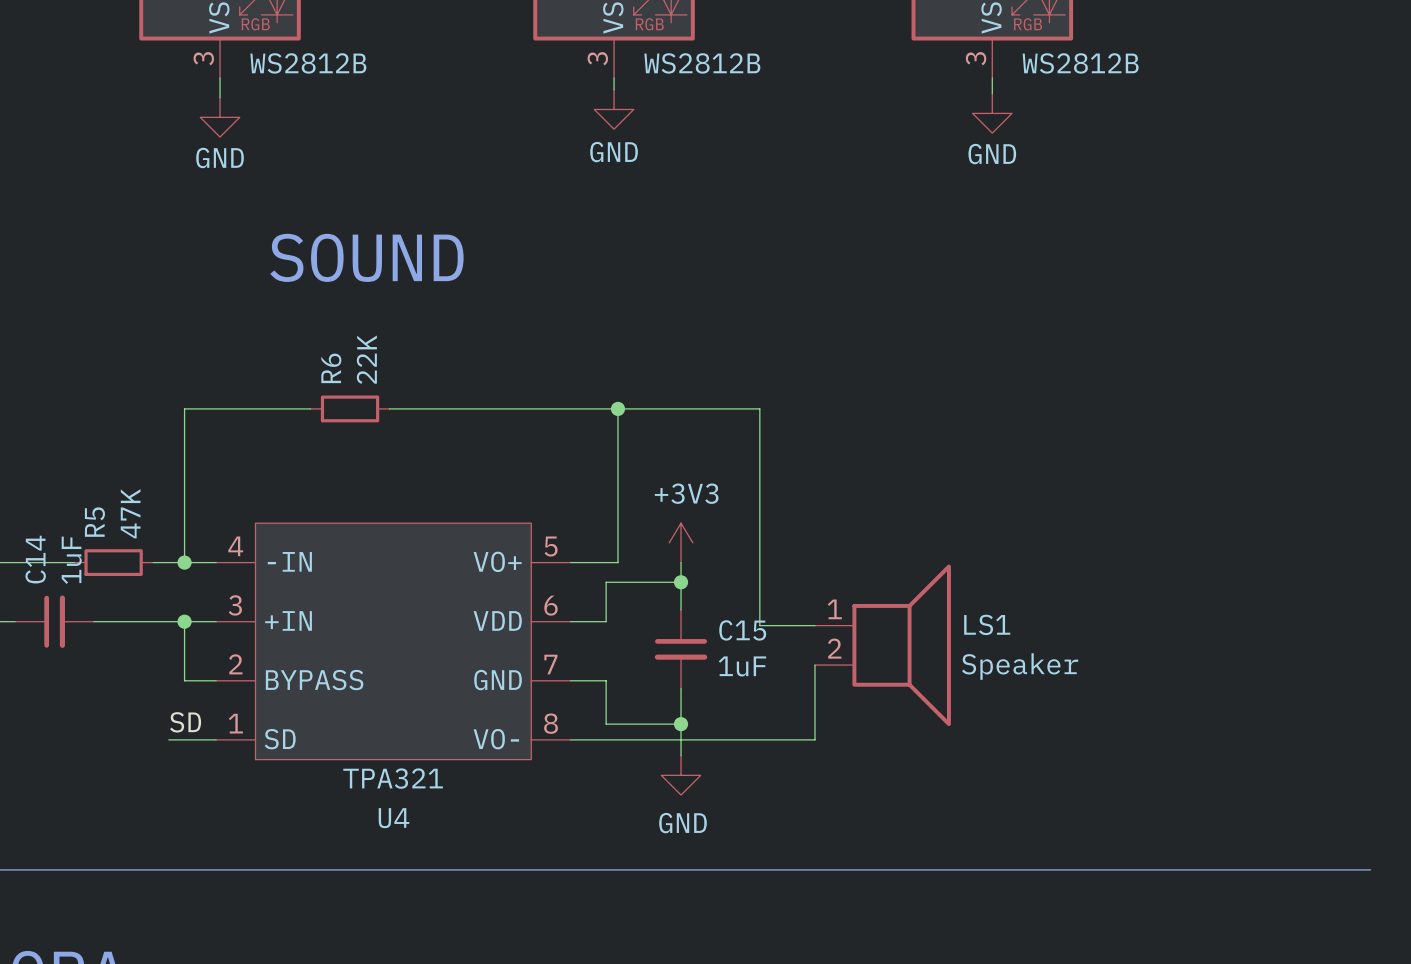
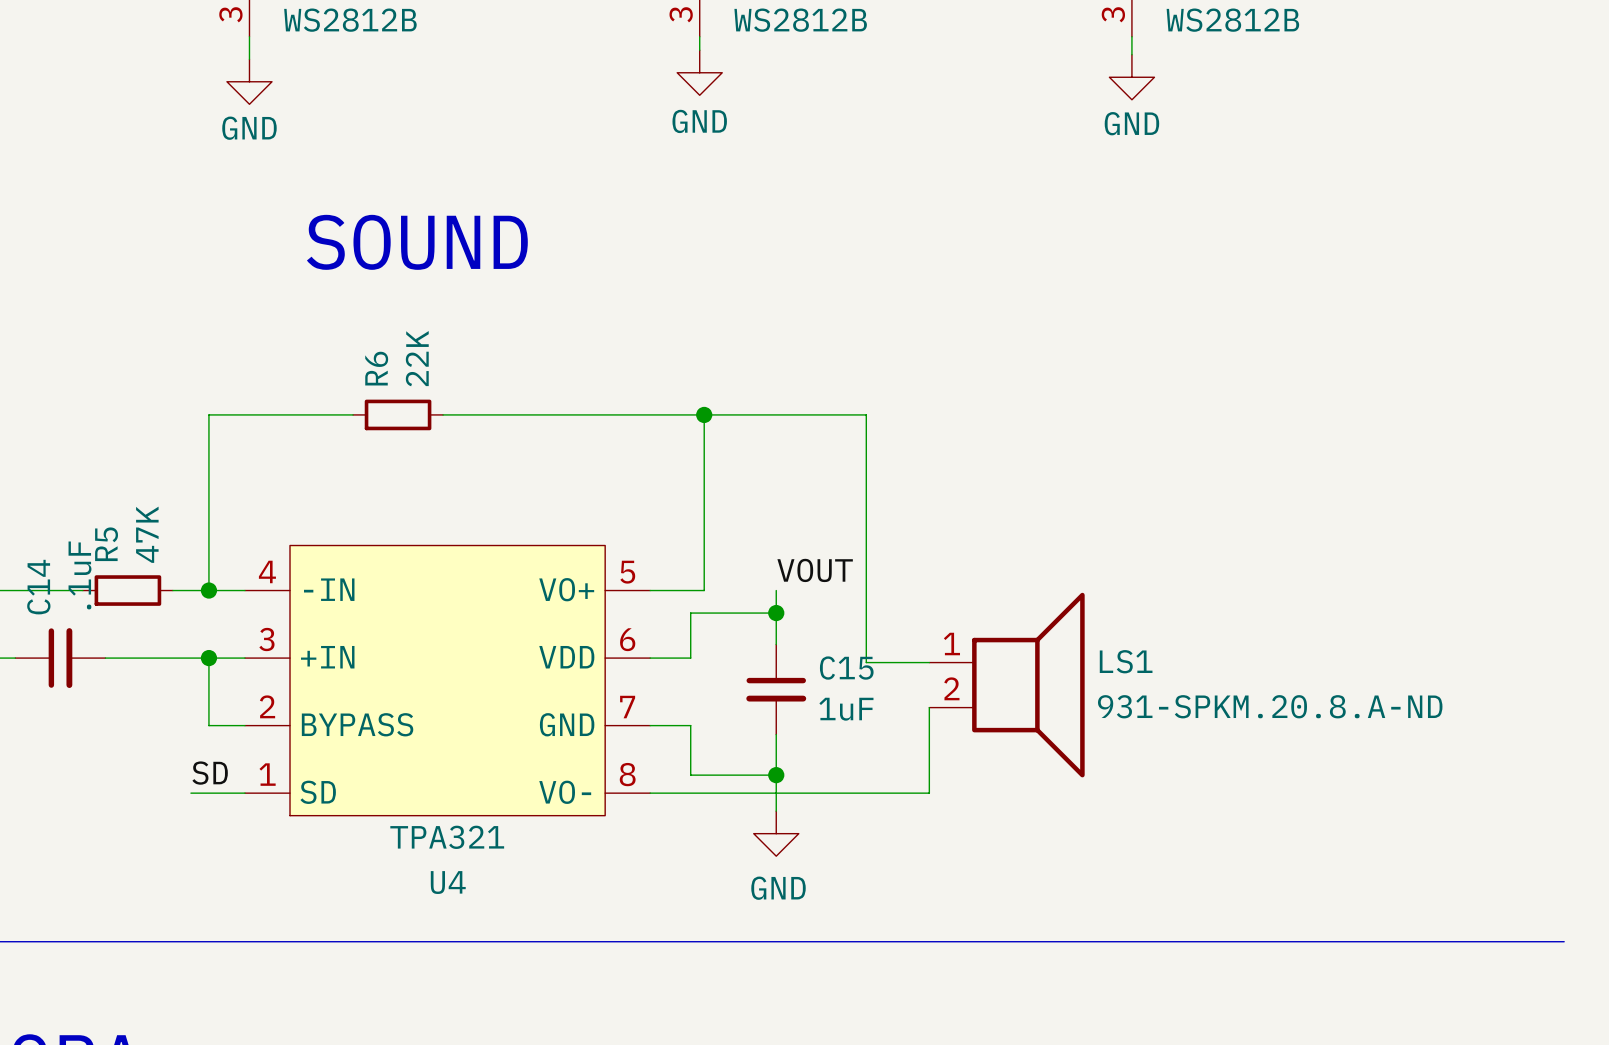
power symbol: +3V3 (681, 542) -> none
label: none -> VOUT (815, 570)
C14 value: 1uF (71, 560) -> .1uF (79, 575)
LS1 value: Speaker (1020, 666) -> 931-SPKM.20.8.A-ND (1270, 706)

